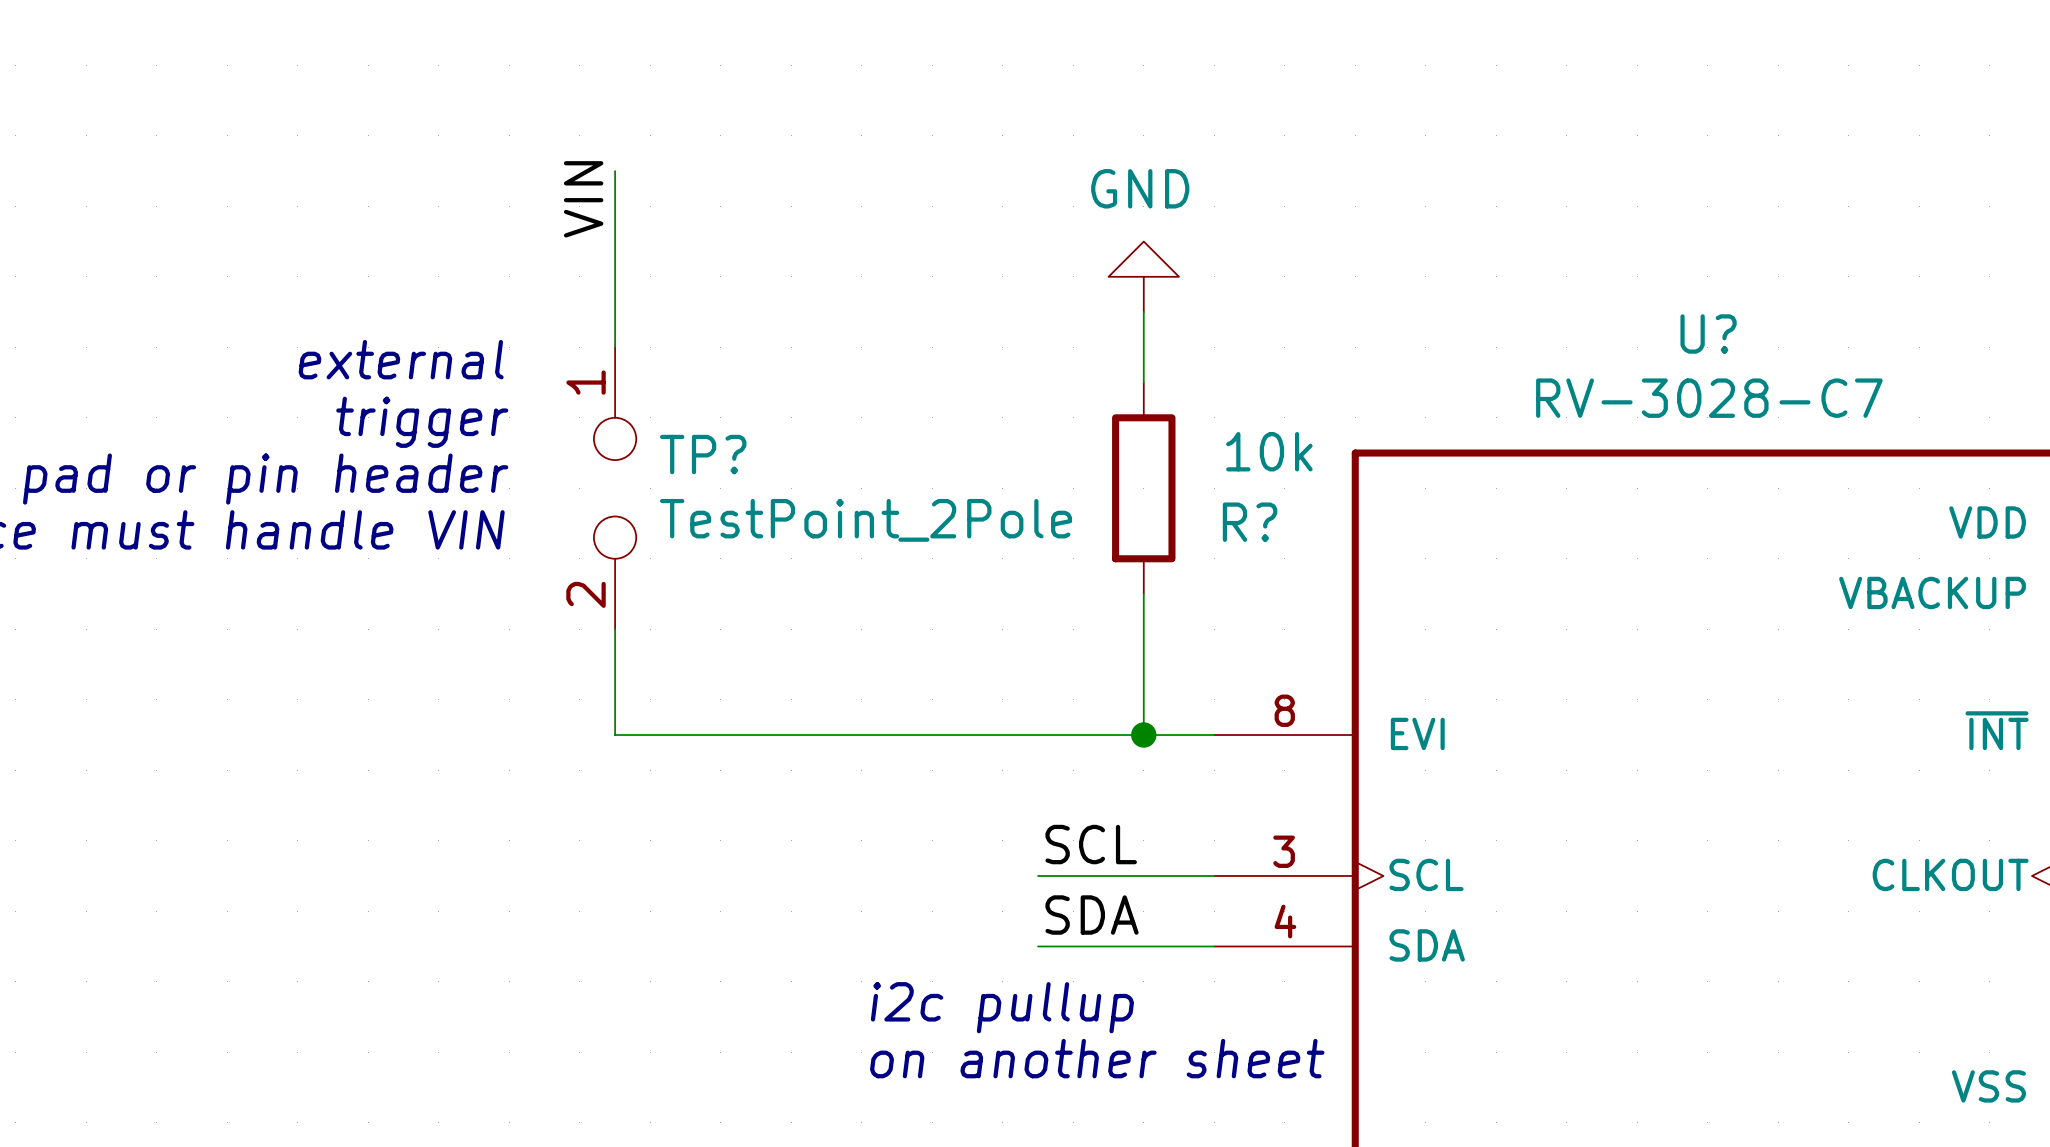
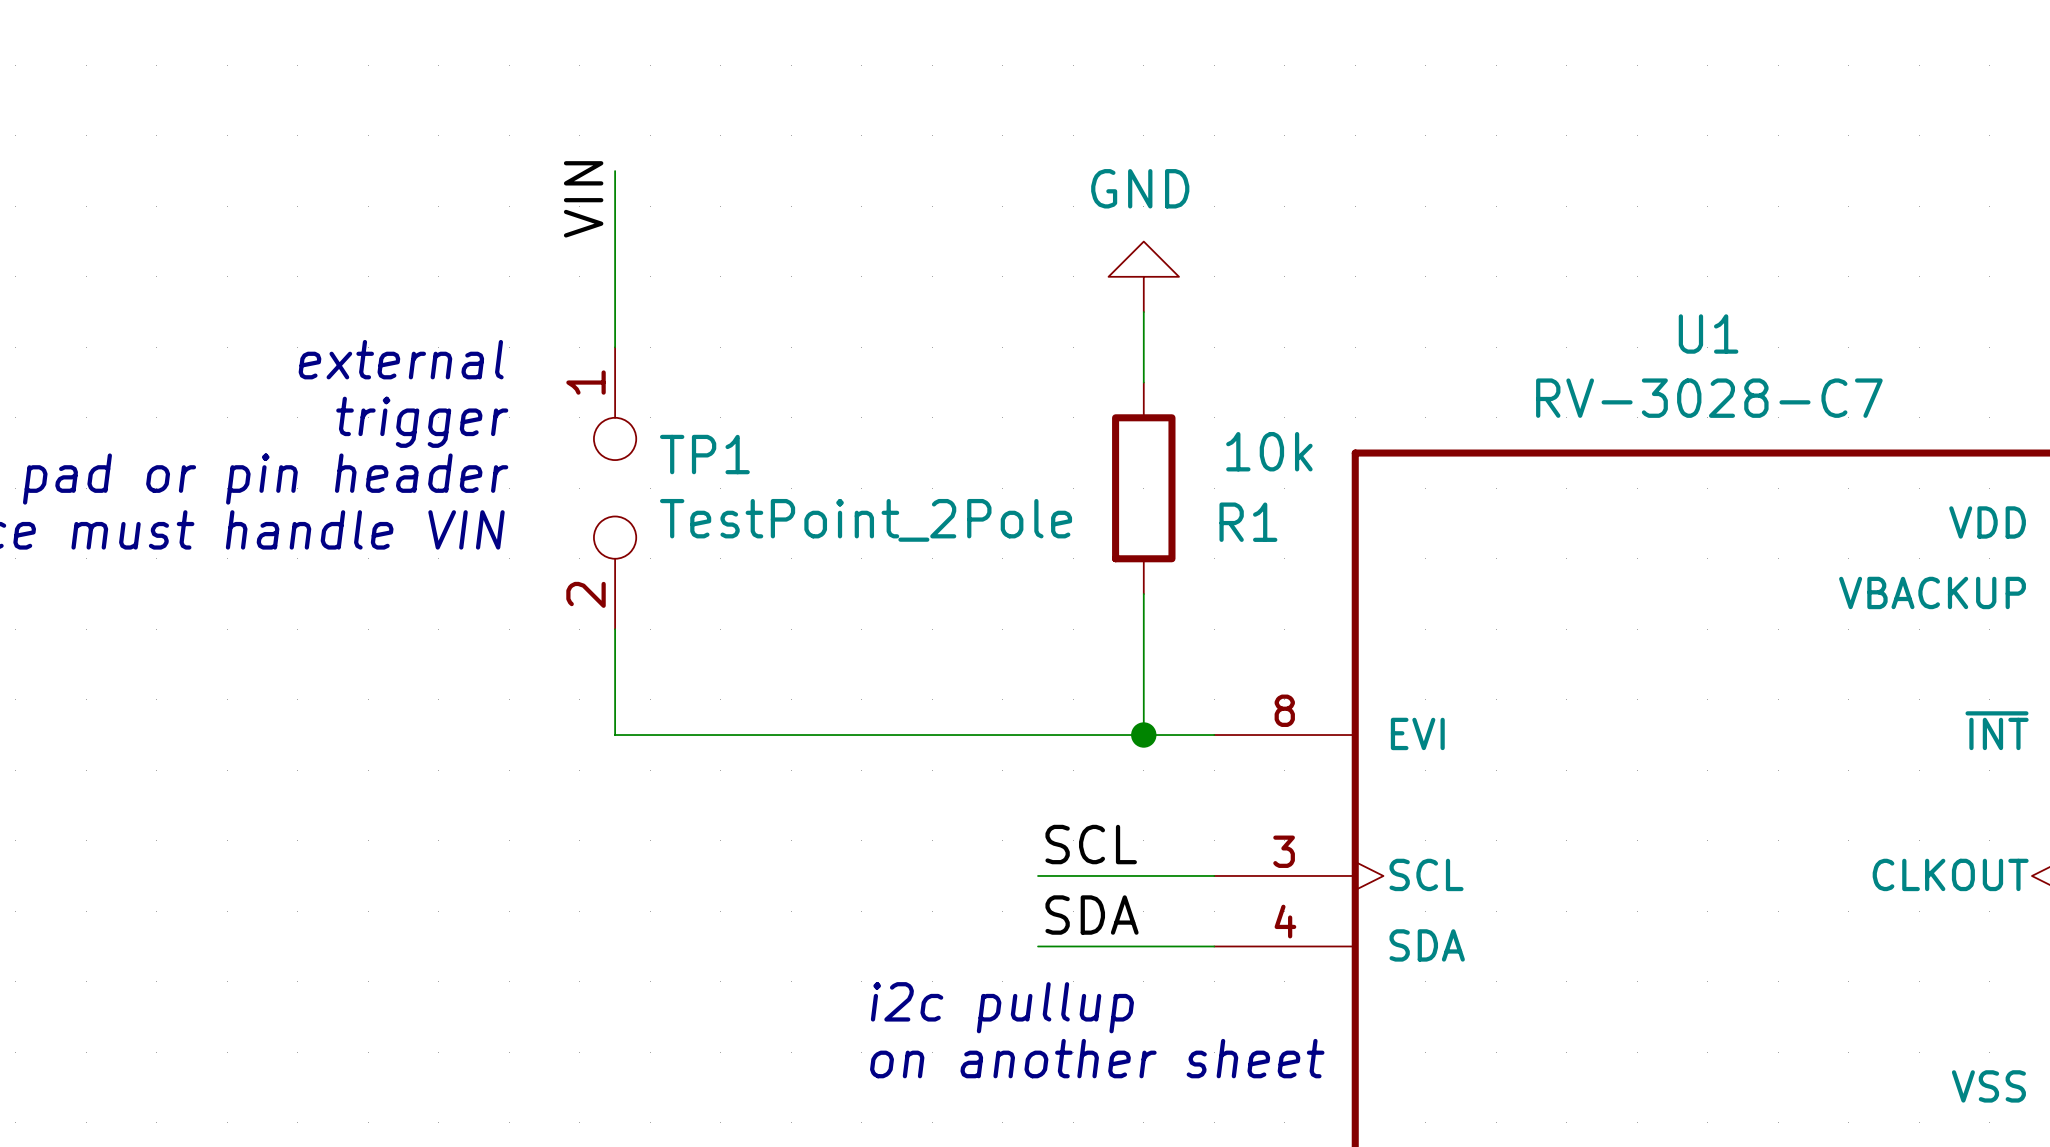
U? name: U? (1708, 334) -> U1 (1708, 334)
TP? name: TP? (703, 454) -> TP1 (704, 454)
R? name: R? (1250, 522) -> R1 (1248, 522)

